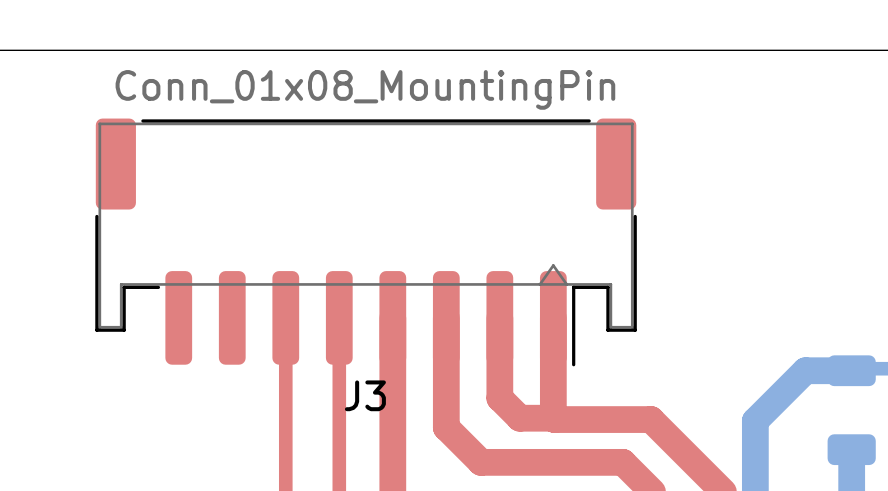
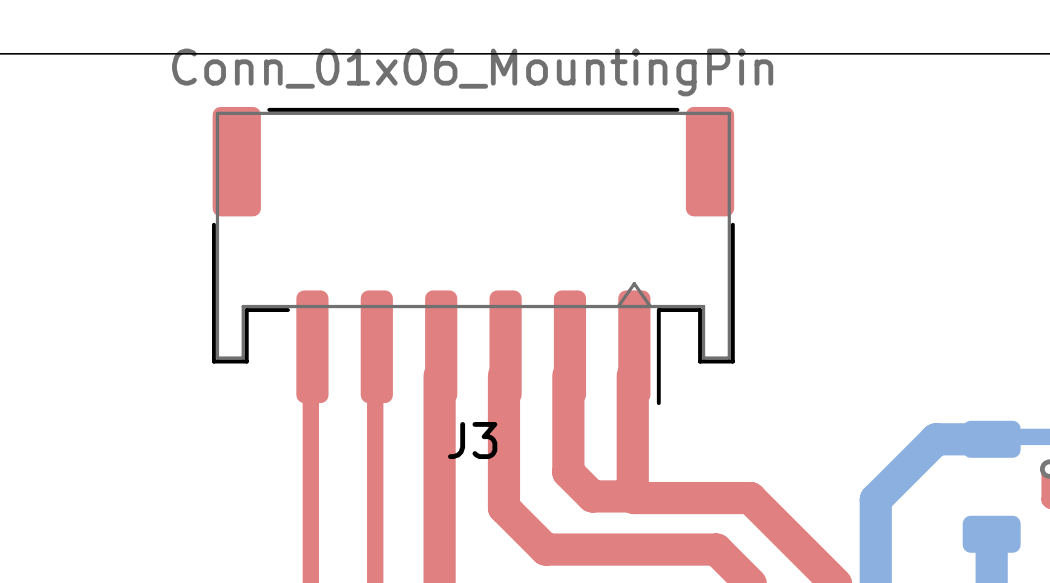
J3 value: Conn_01x08_MountingPin (365, 89) -> Conn_01x06_MountingPin (472, 72)
J3 footprint: [95, 118, 637, 367] -> [212, 106, 735, 406]

